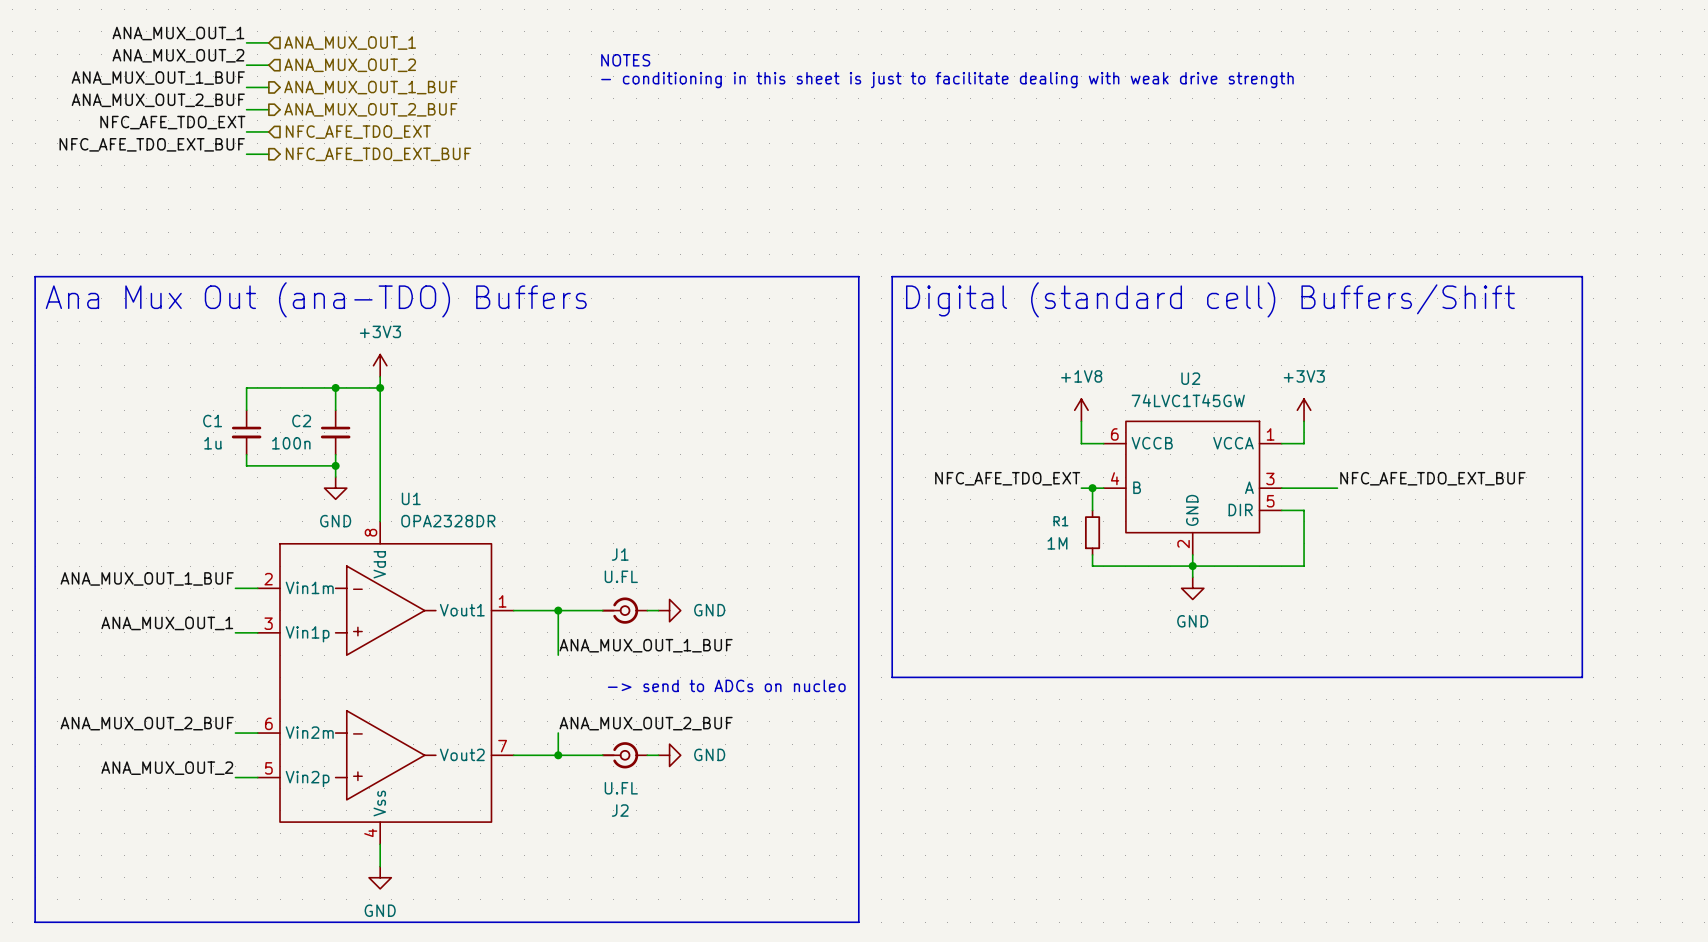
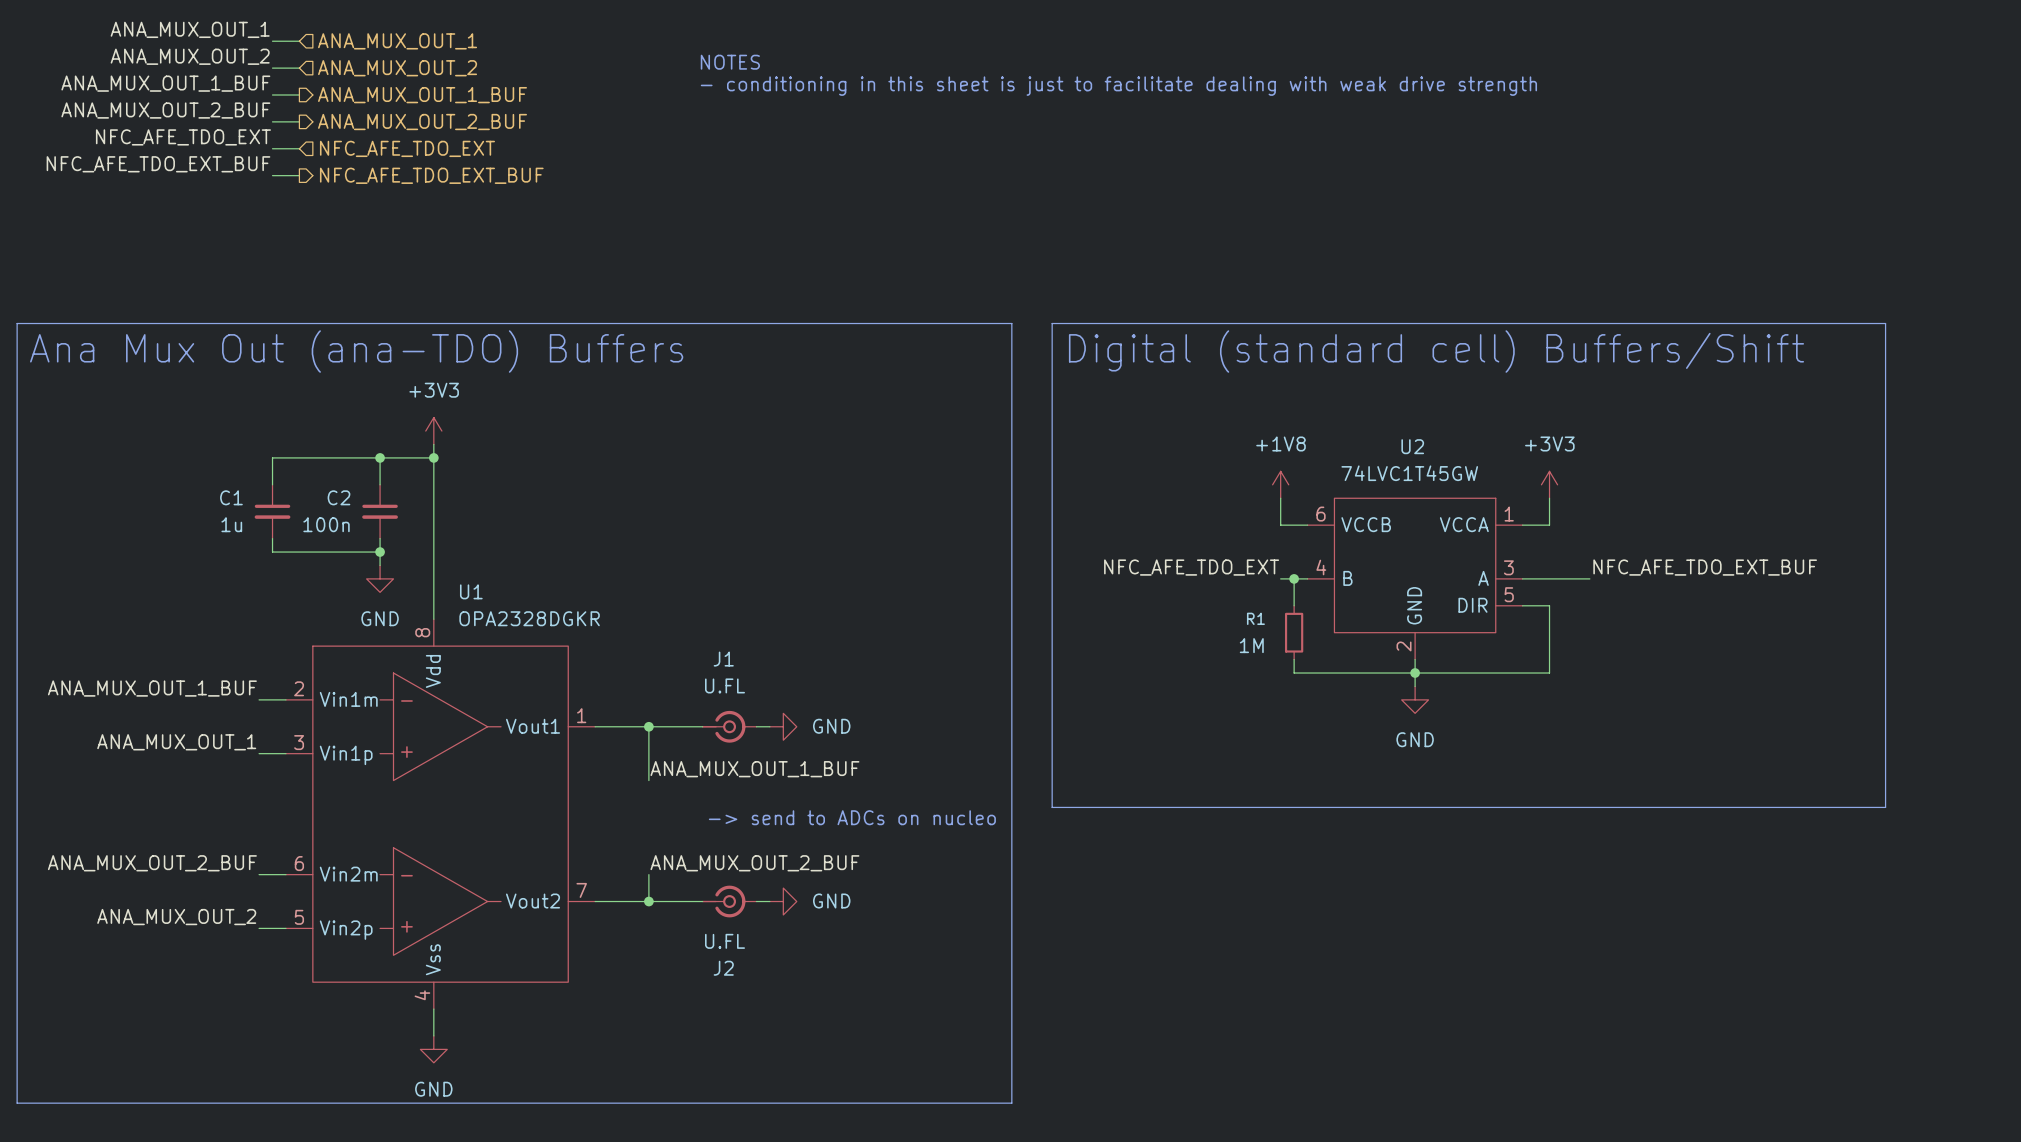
U1 value: OPA2328DR (448, 521) -> OPA2328DGKR (529, 618)

